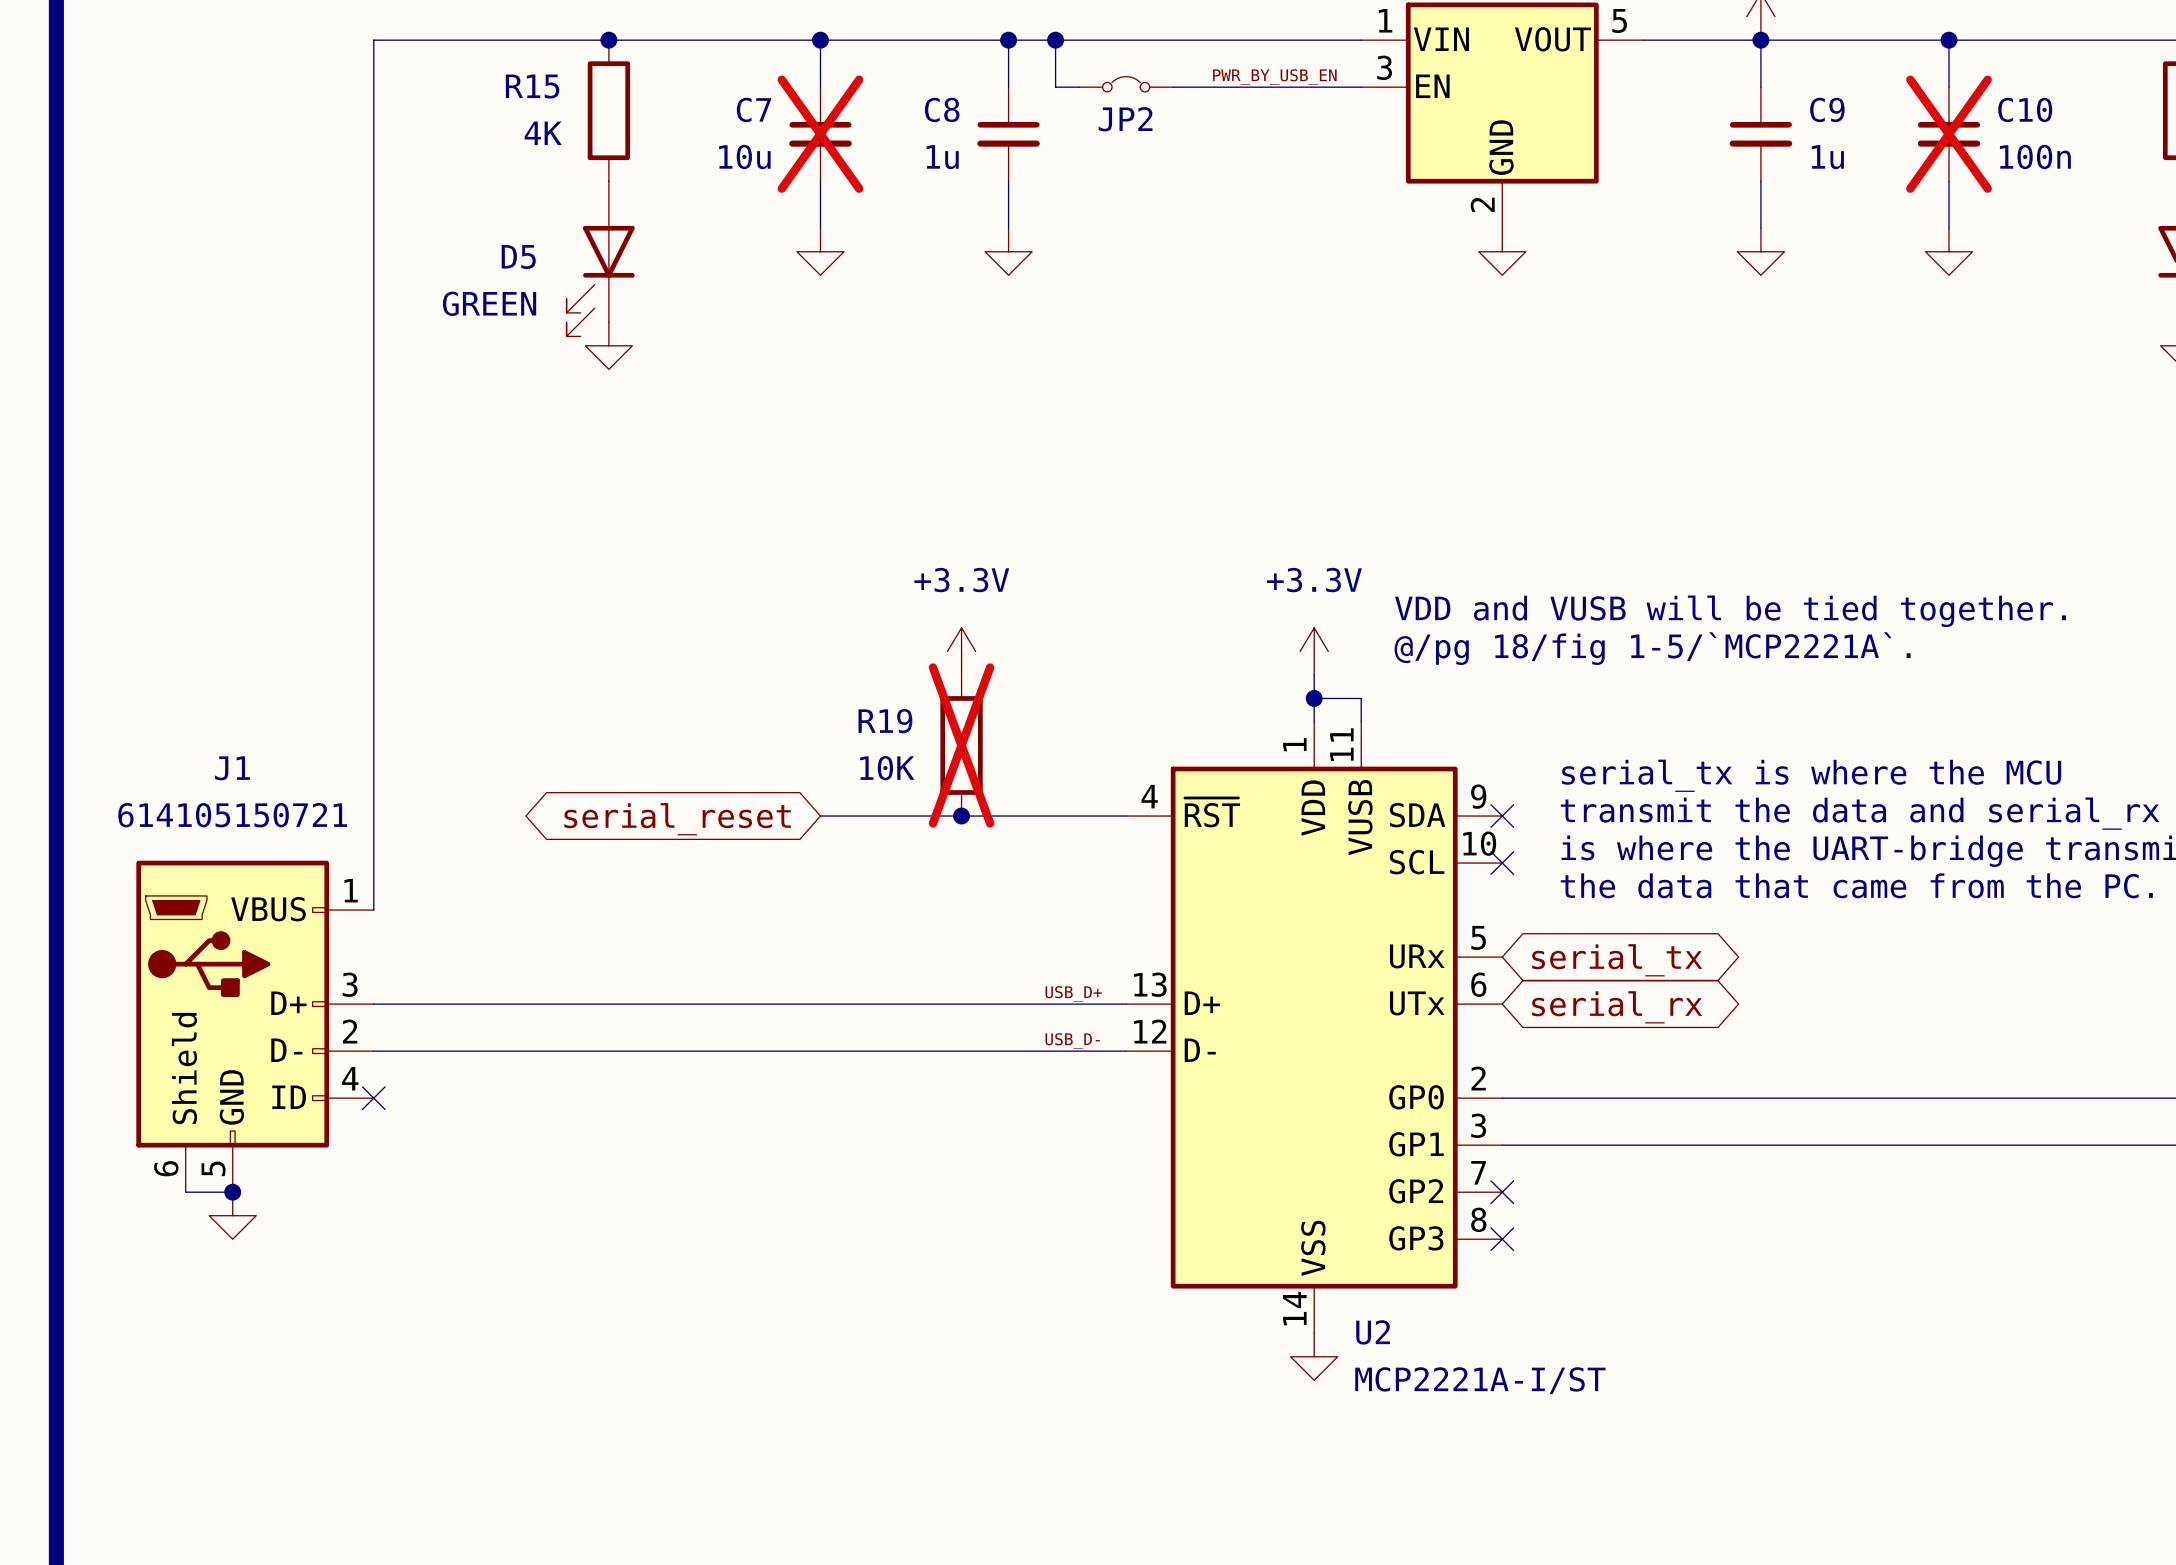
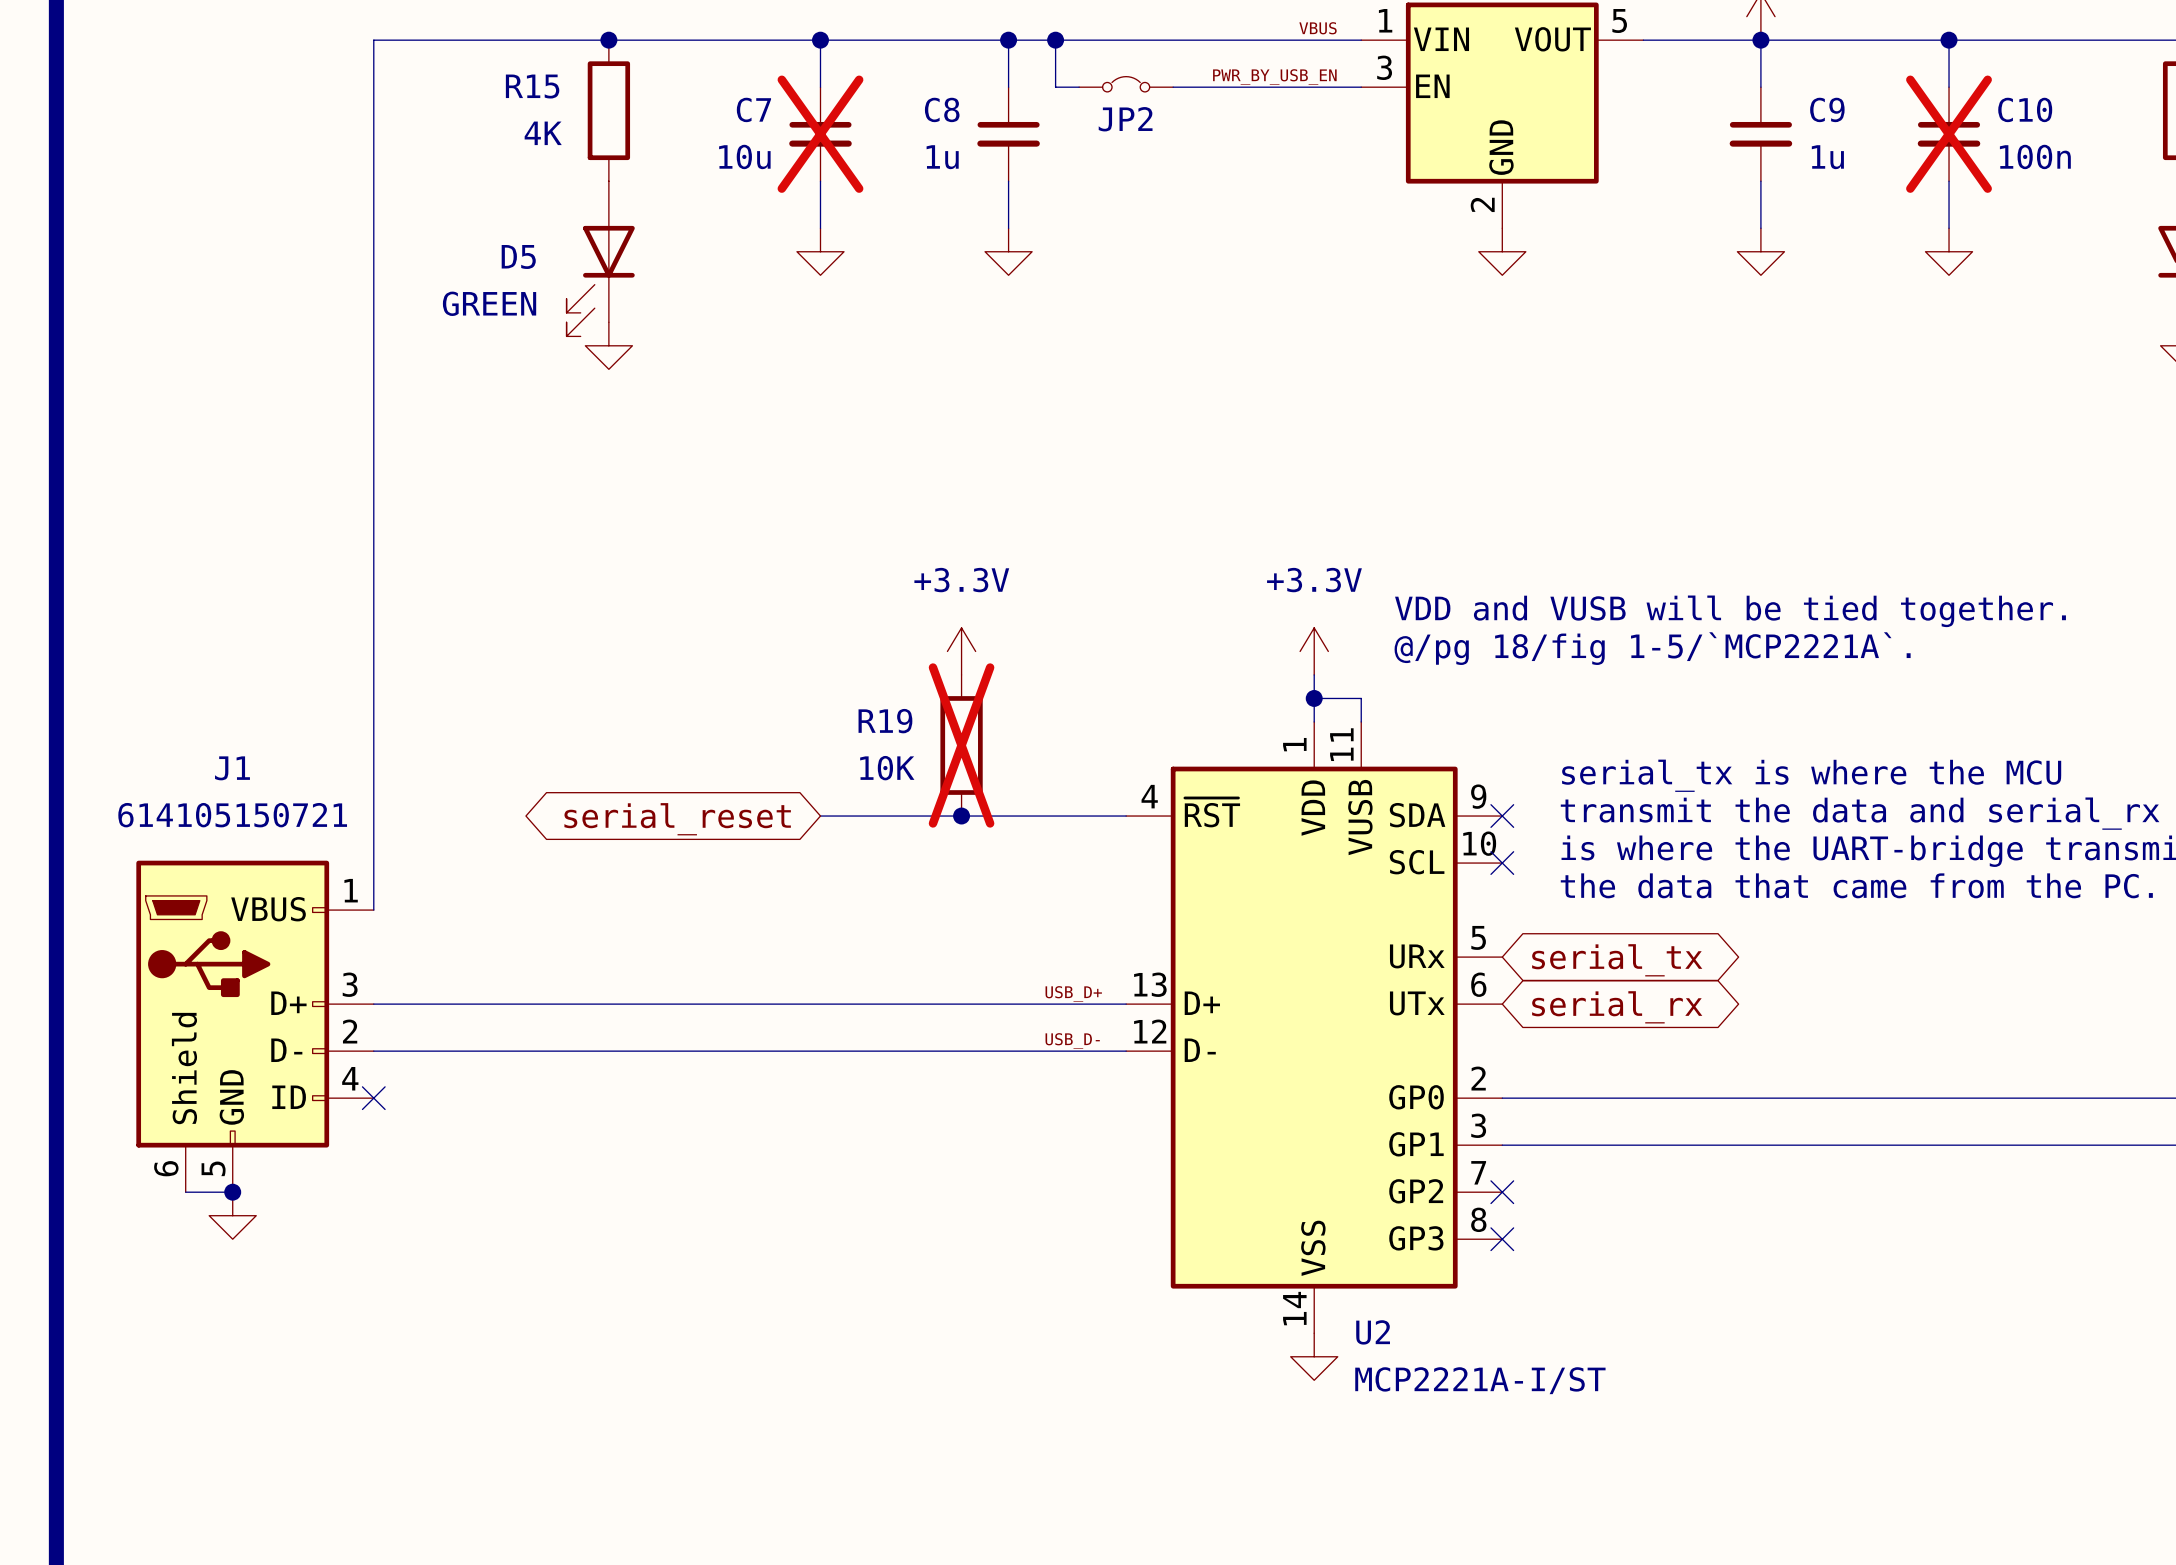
label: none -> VBUS (1318, 28)

